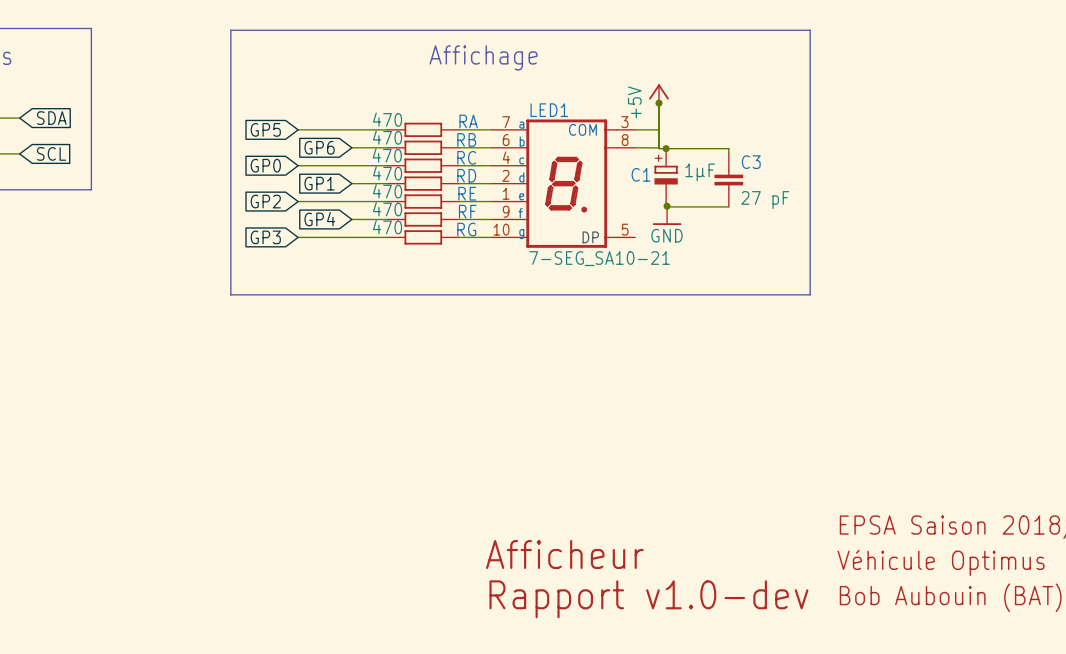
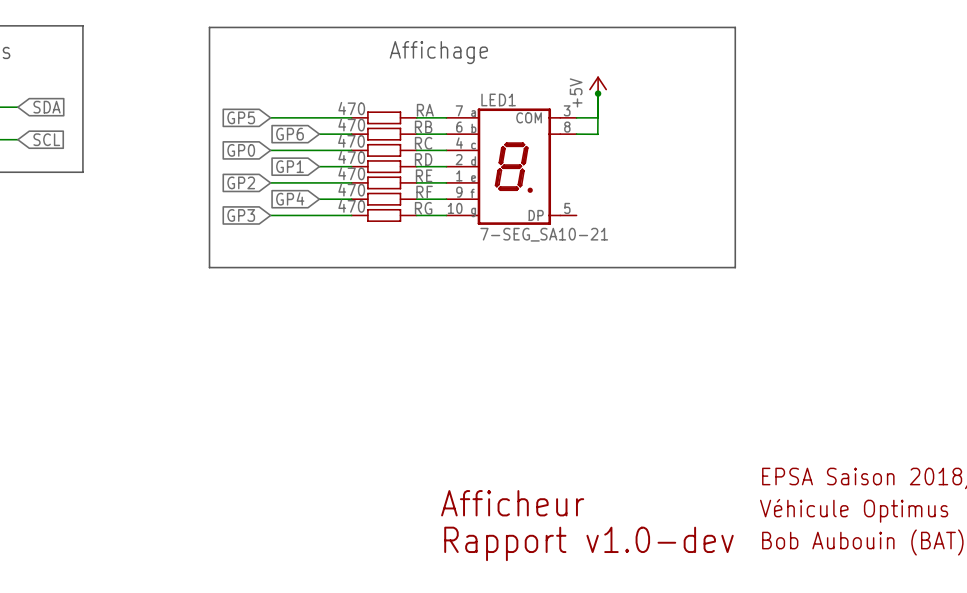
wire: (659, 129) (659, 148) (728, 148) (728, 153) -> none
junction: (666, 148) -> none
C1: 1µF (666, 175) -> none
C3: 27 pF (728, 180) -> none
wire: (666, 202) (667, 206) (728, 206) -> none
junction: (667, 206) -> none
power symbol: GND (667, 215) -> none

